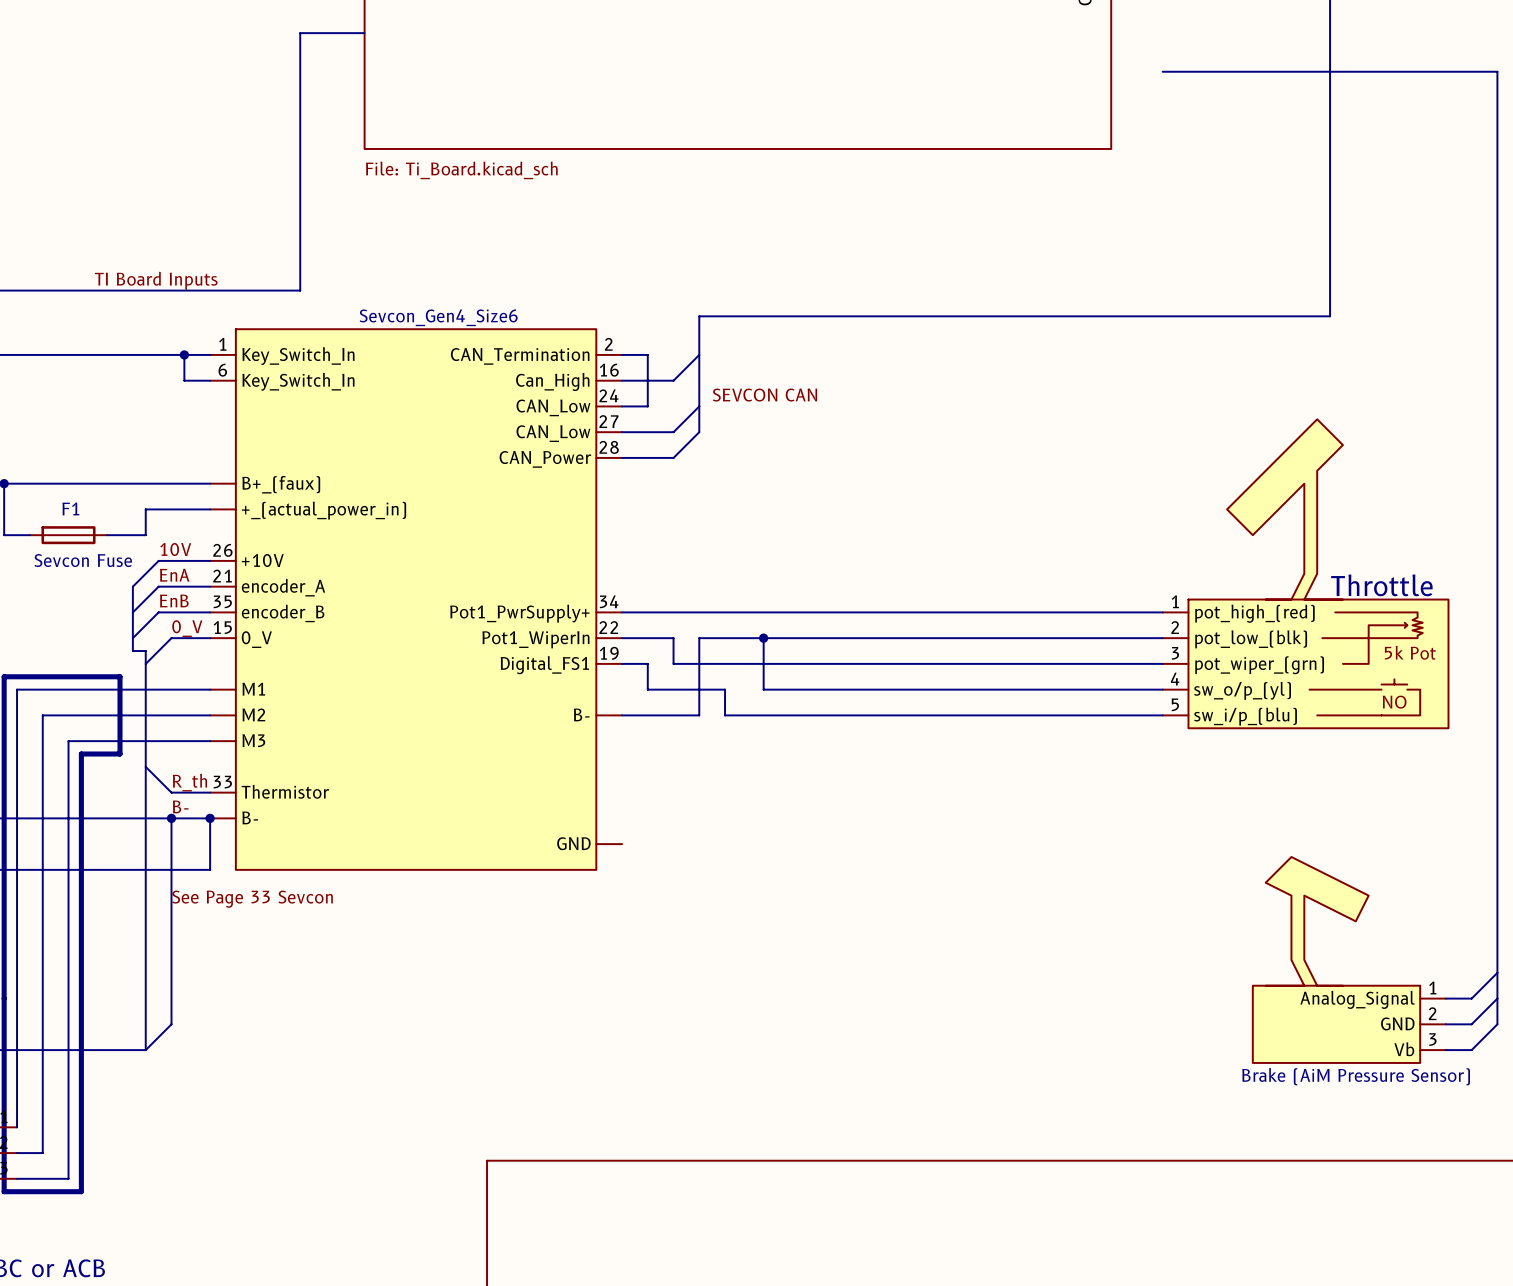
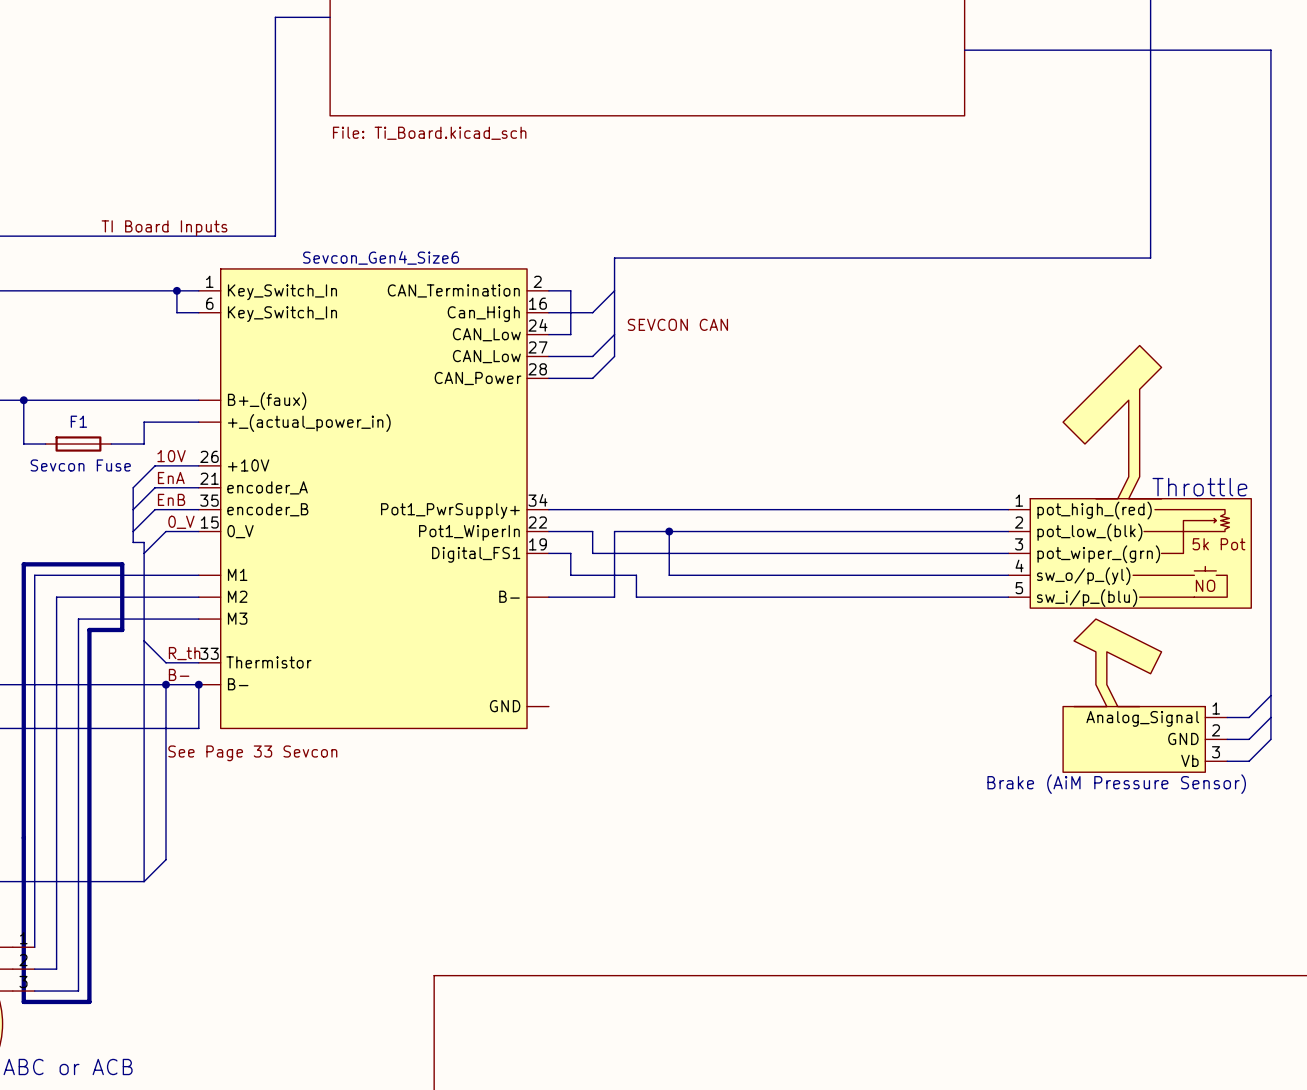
bus: none -> (964, 50) (1008, 50)
bus: (1471, 71) (1497, 71) (1497, 1024) -> (1270, 50) (1270, 739)
part: none -> Brake (AiM Pressure Sensor) (1134, 701)
part: Brake (AiM Pressure Sensor) (1336, 966) -> none
wire: (1497, 972) (1471, 998) (1445, 998) -> (1270, 695) (1249, 717) (1227, 717)
wire: (1497, 998) (1471, 1024) (1445, 1024) -> (1270, 717) (1249, 739) (1227, 739)
wire: (1497, 1024) (1471, 1050) (1445, 1050) -> (1270, 739) (1249, 761) (1227, 761)

